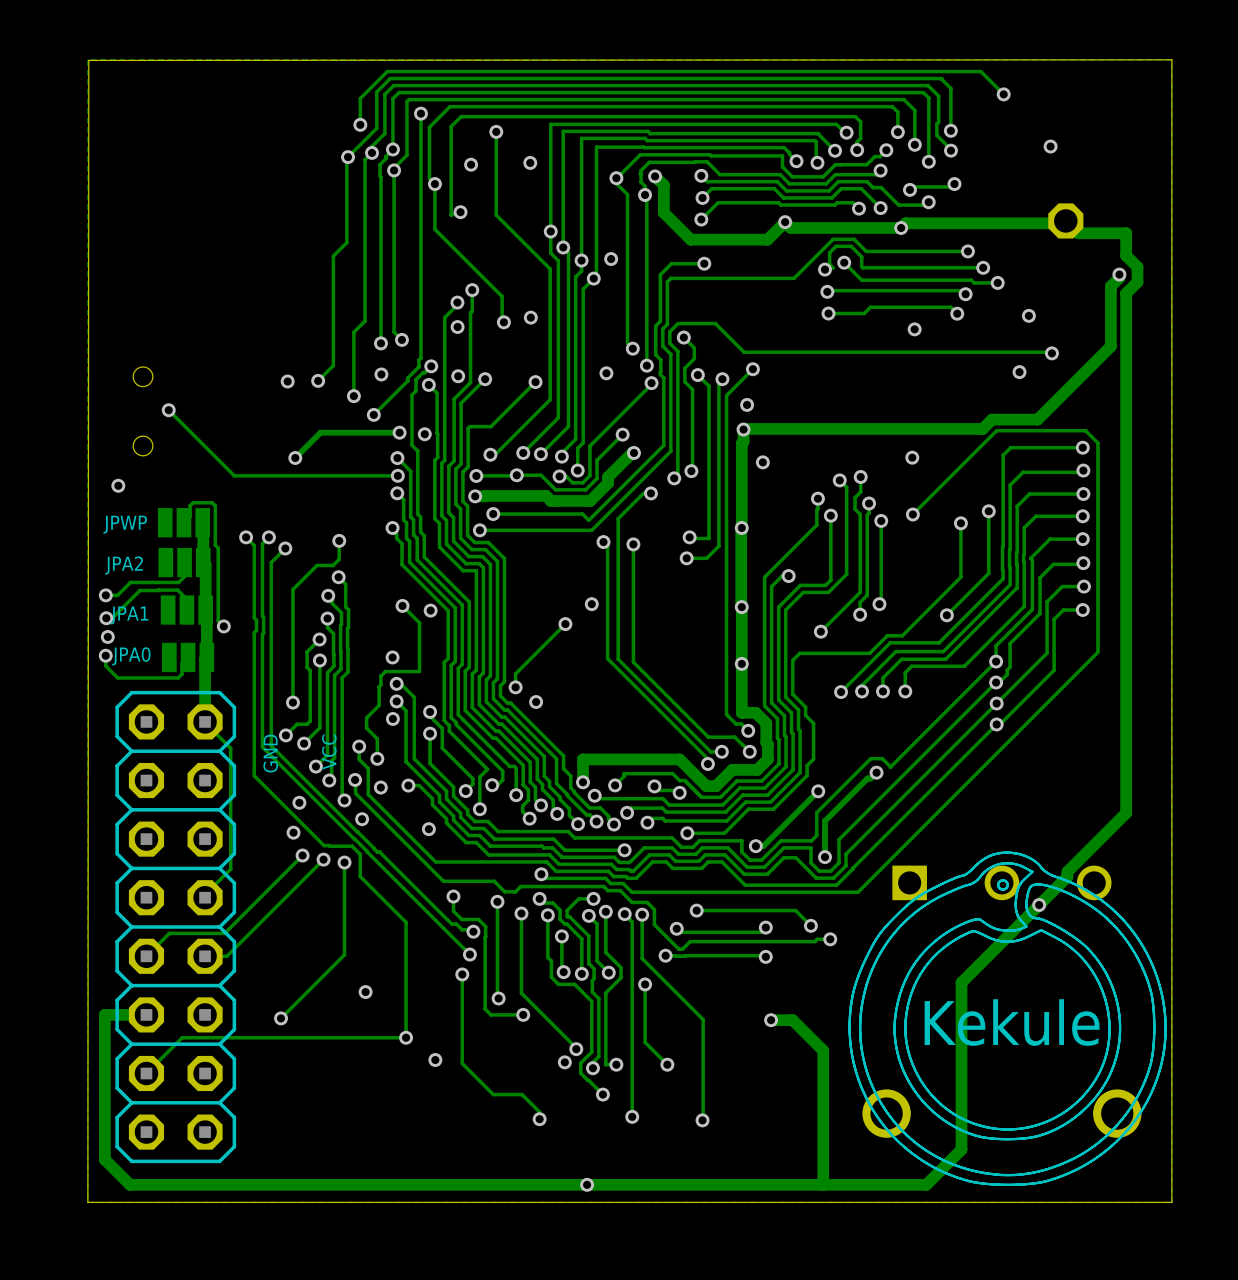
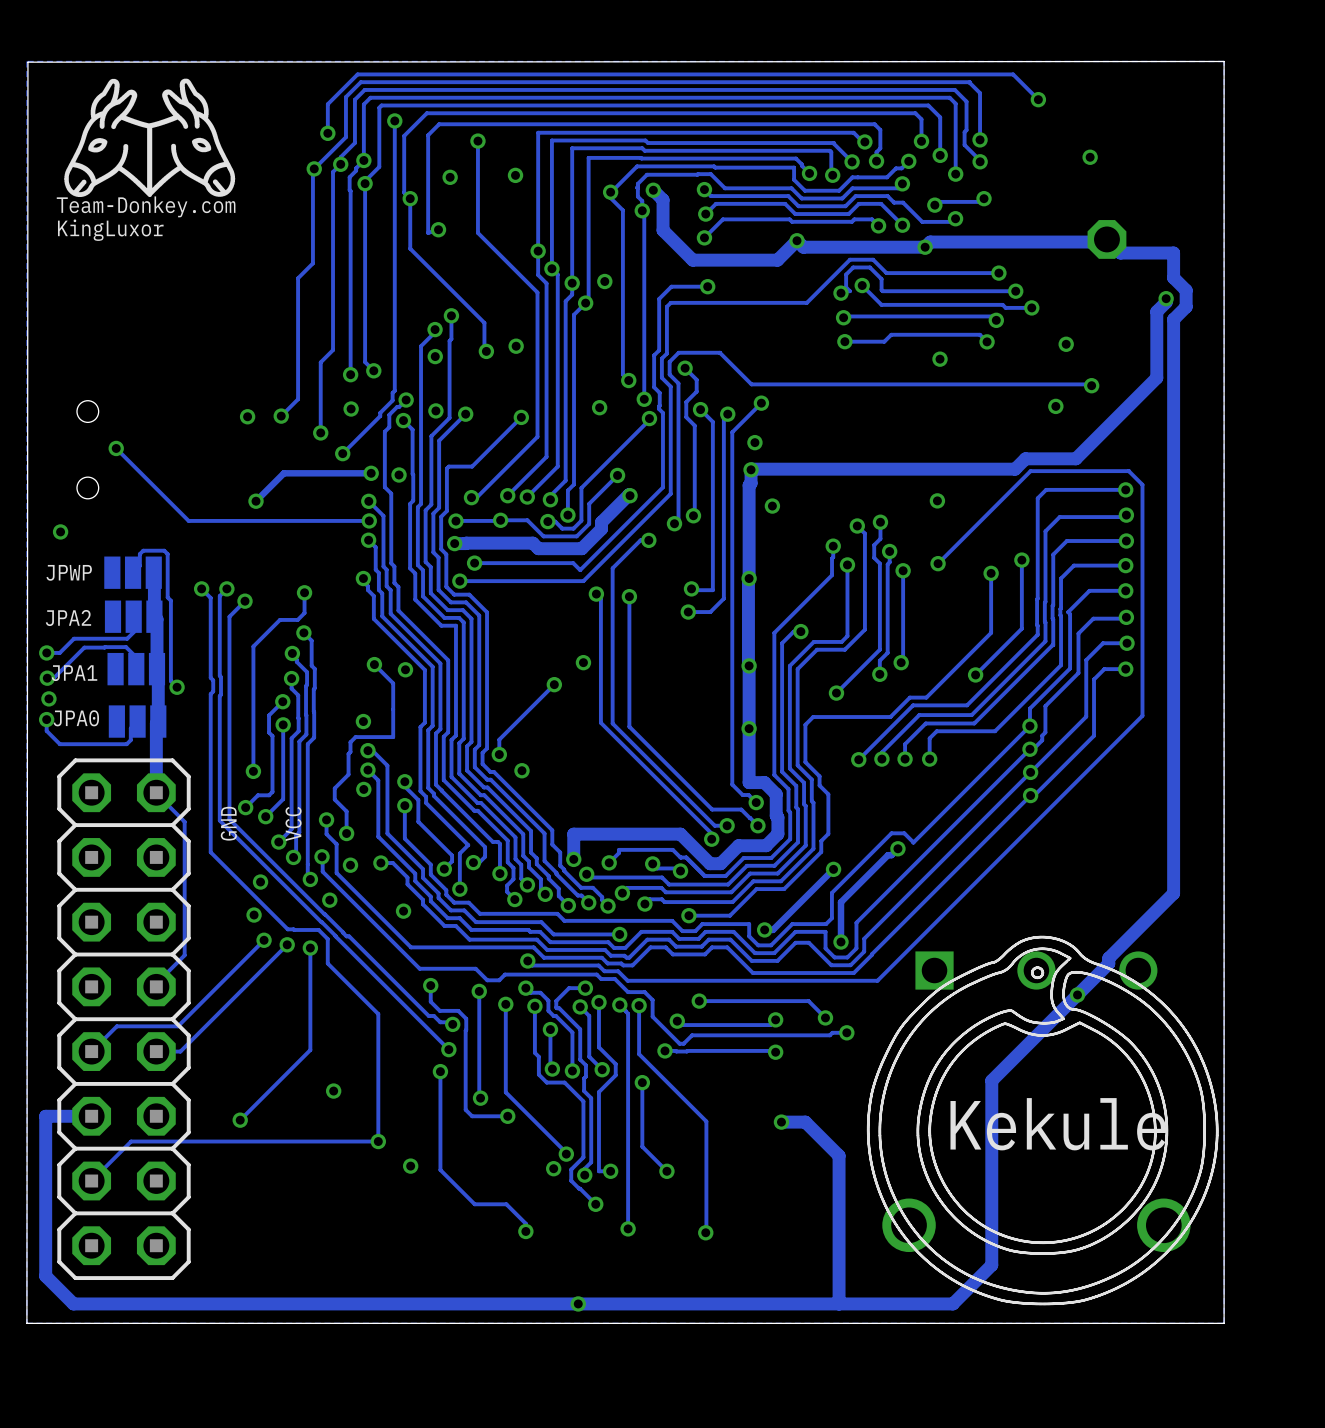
drawing: none -> [64, 78, 236, 198]
text: none -> Team-Donkey.com (146, 206)
text: none -> KingLuxor (110, 230)

